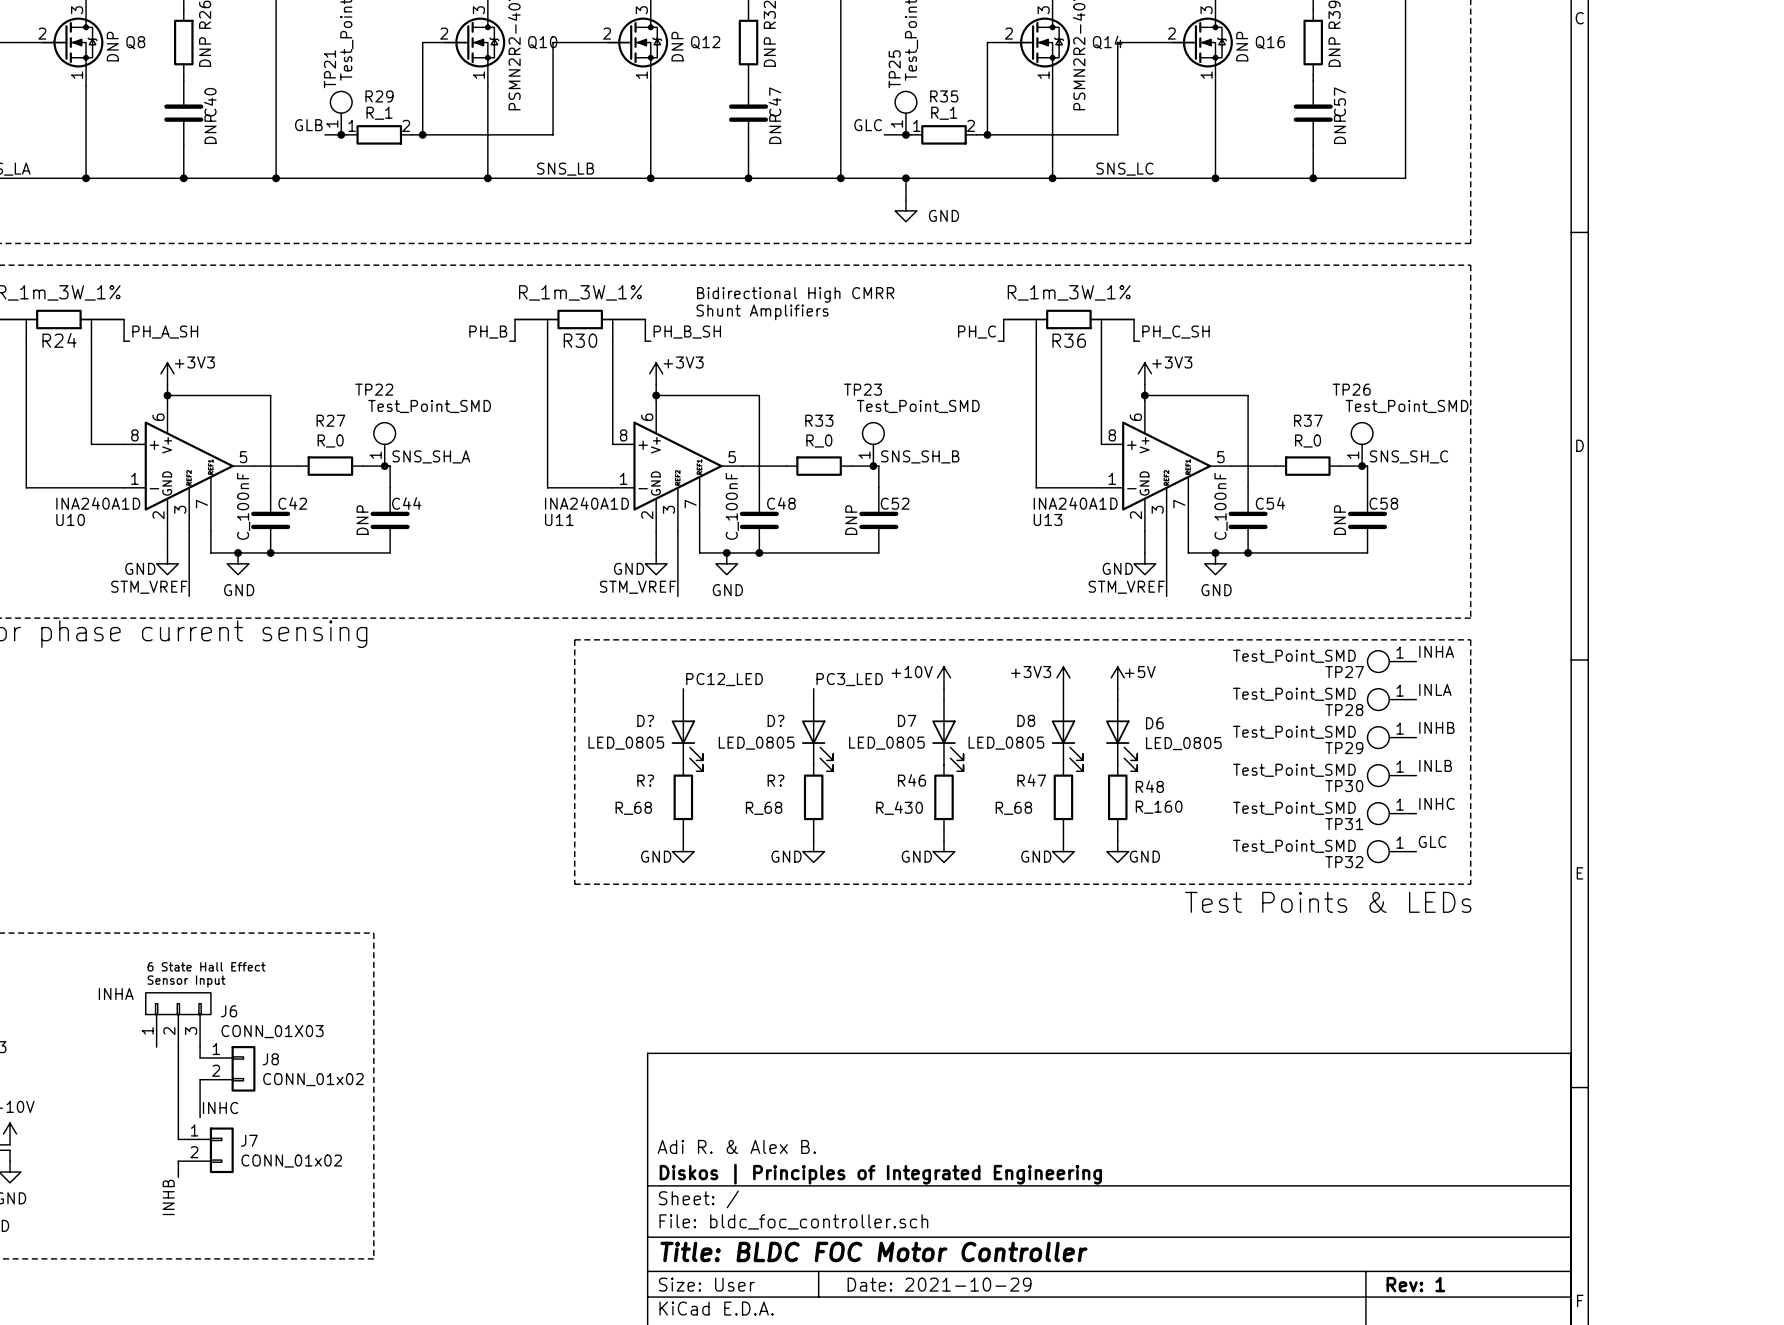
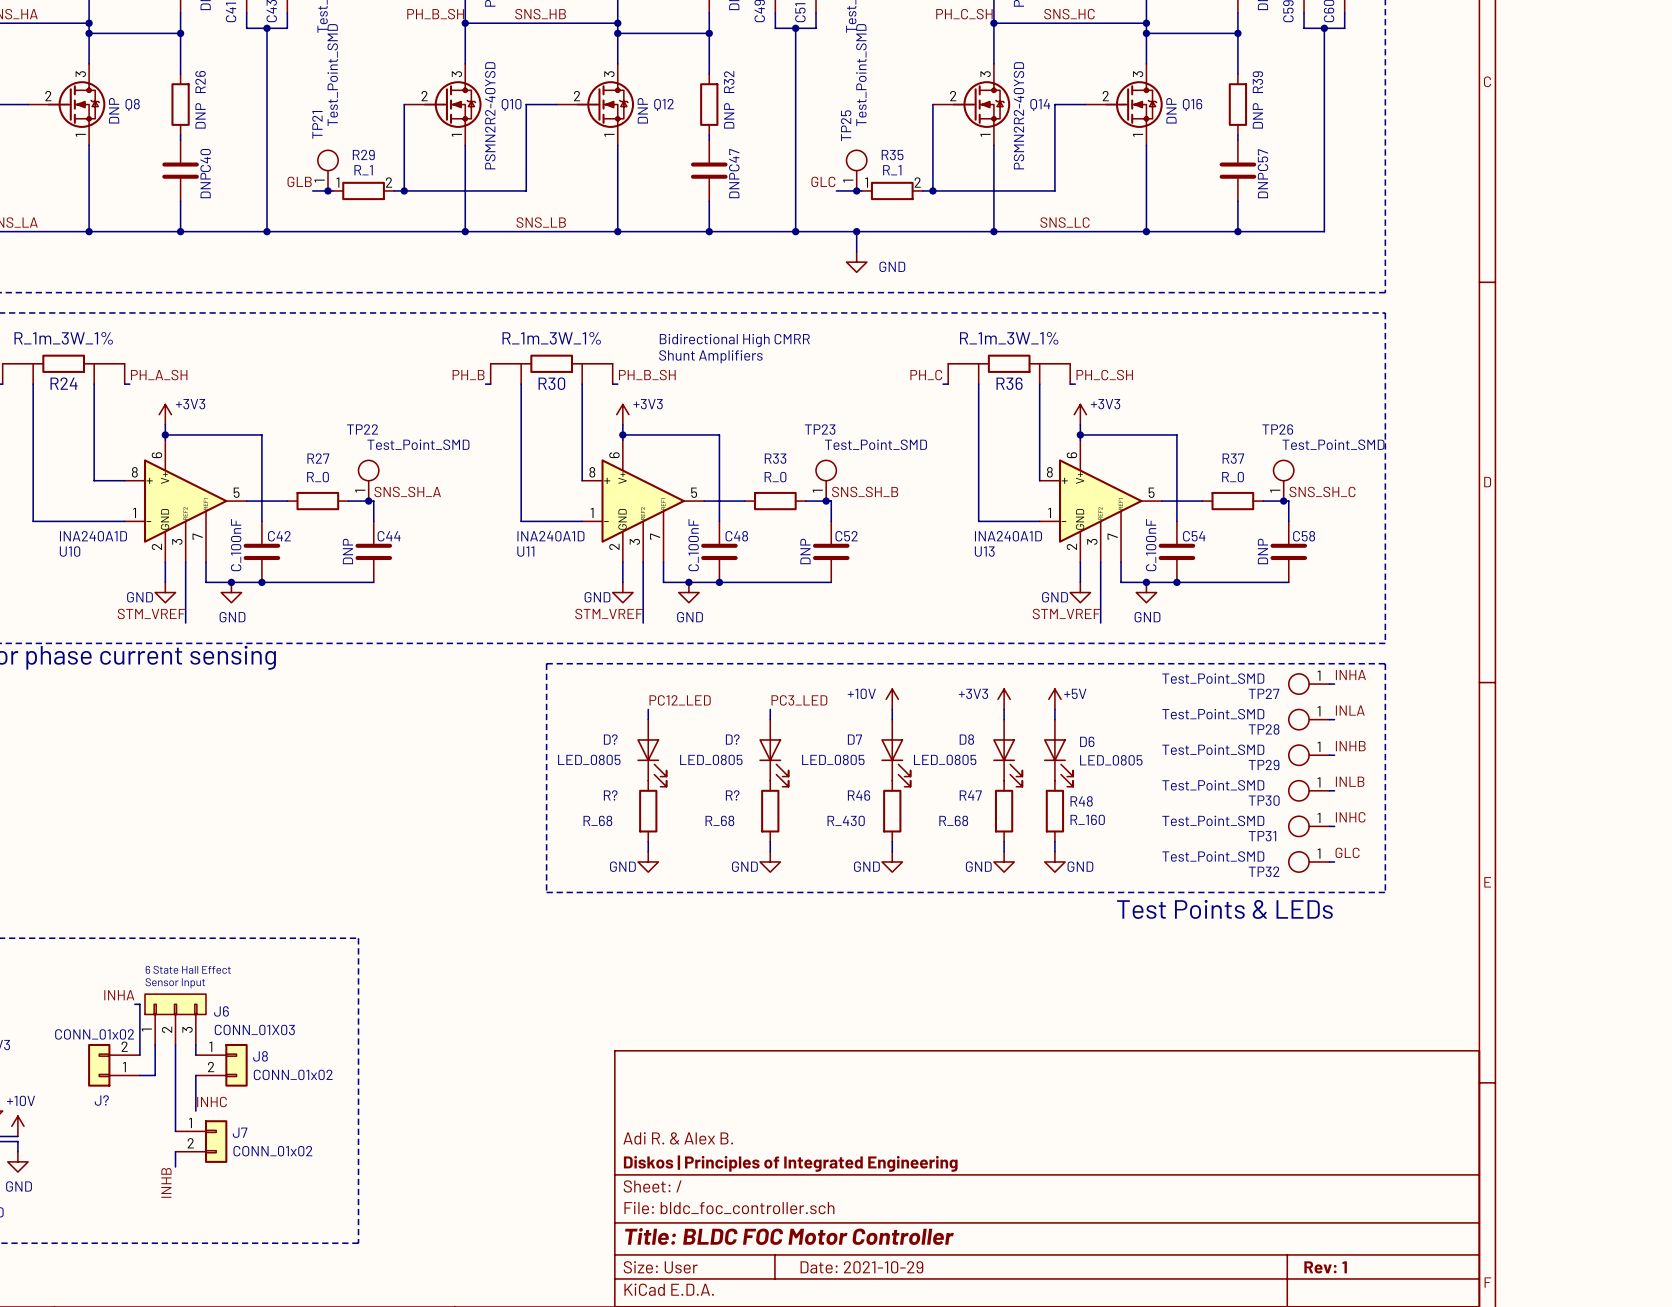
wire: none -> (134, 1004) (139, 1004) (139, 1055)
wire: none -> (155, 1044) (155, 1075) (139, 1075)
J?: none -> CONN_01x02 (113, 1065)

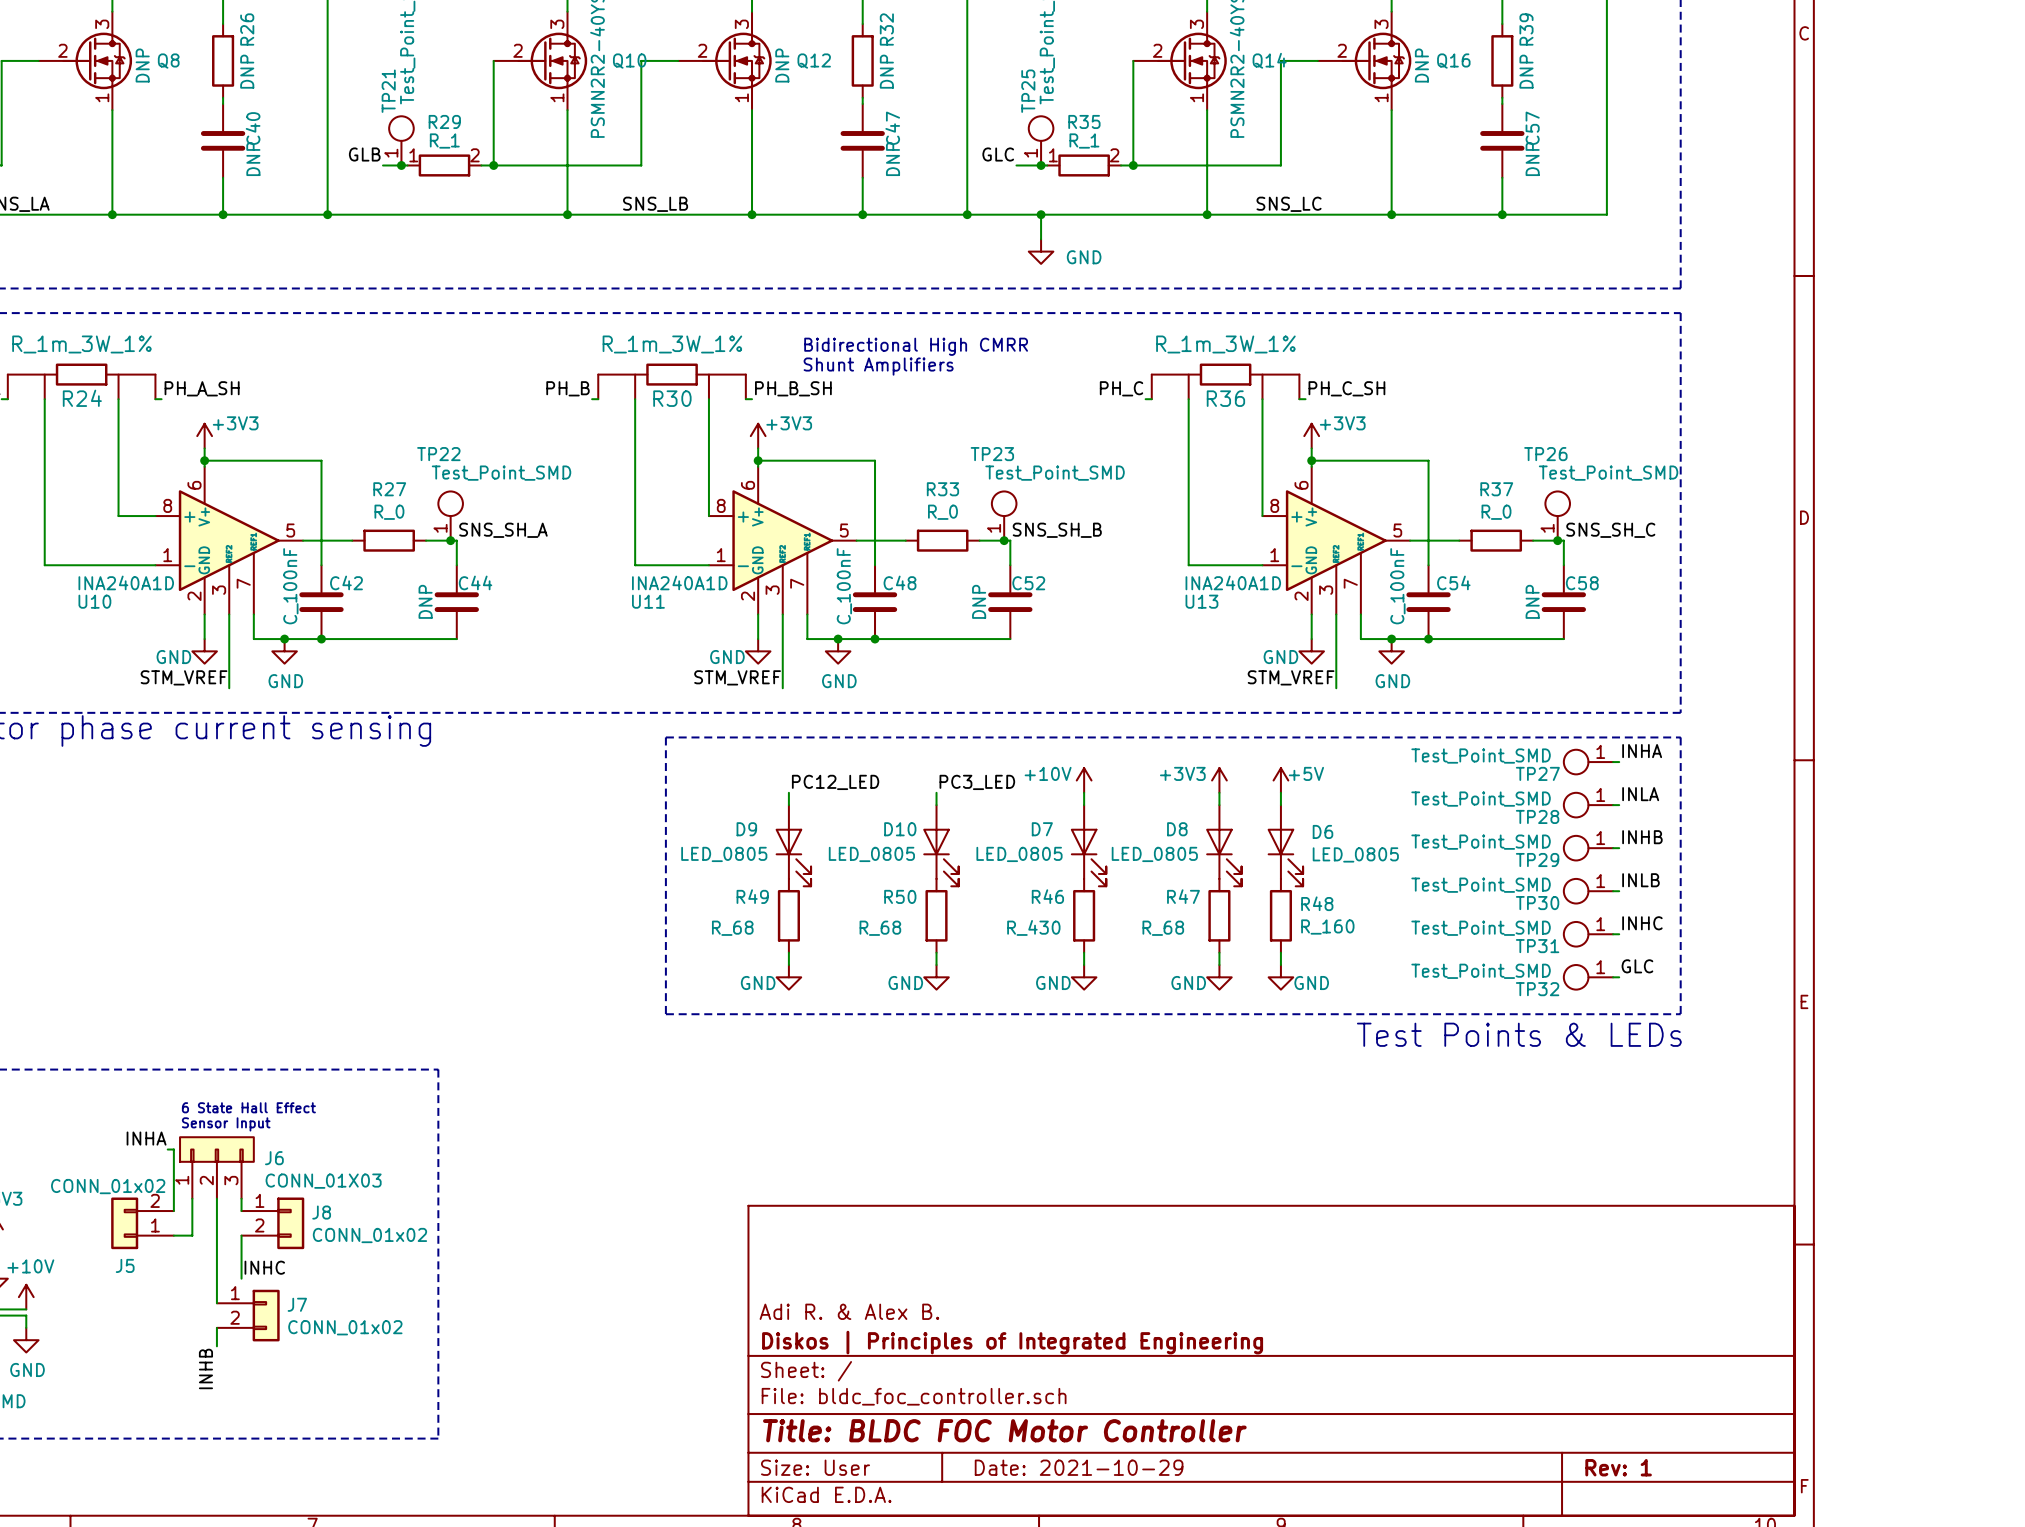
D? name: D? (610, 739) -> D9 (746, 829)
D? name: D? (732, 739) -> D10 (900, 829)
R? name: R? (610, 795) -> R49 (752, 896)
R? name: R? (732, 795) -> R50 (900, 896)
J? name: J? (101, 1100) -> J5 (125, 1265)

